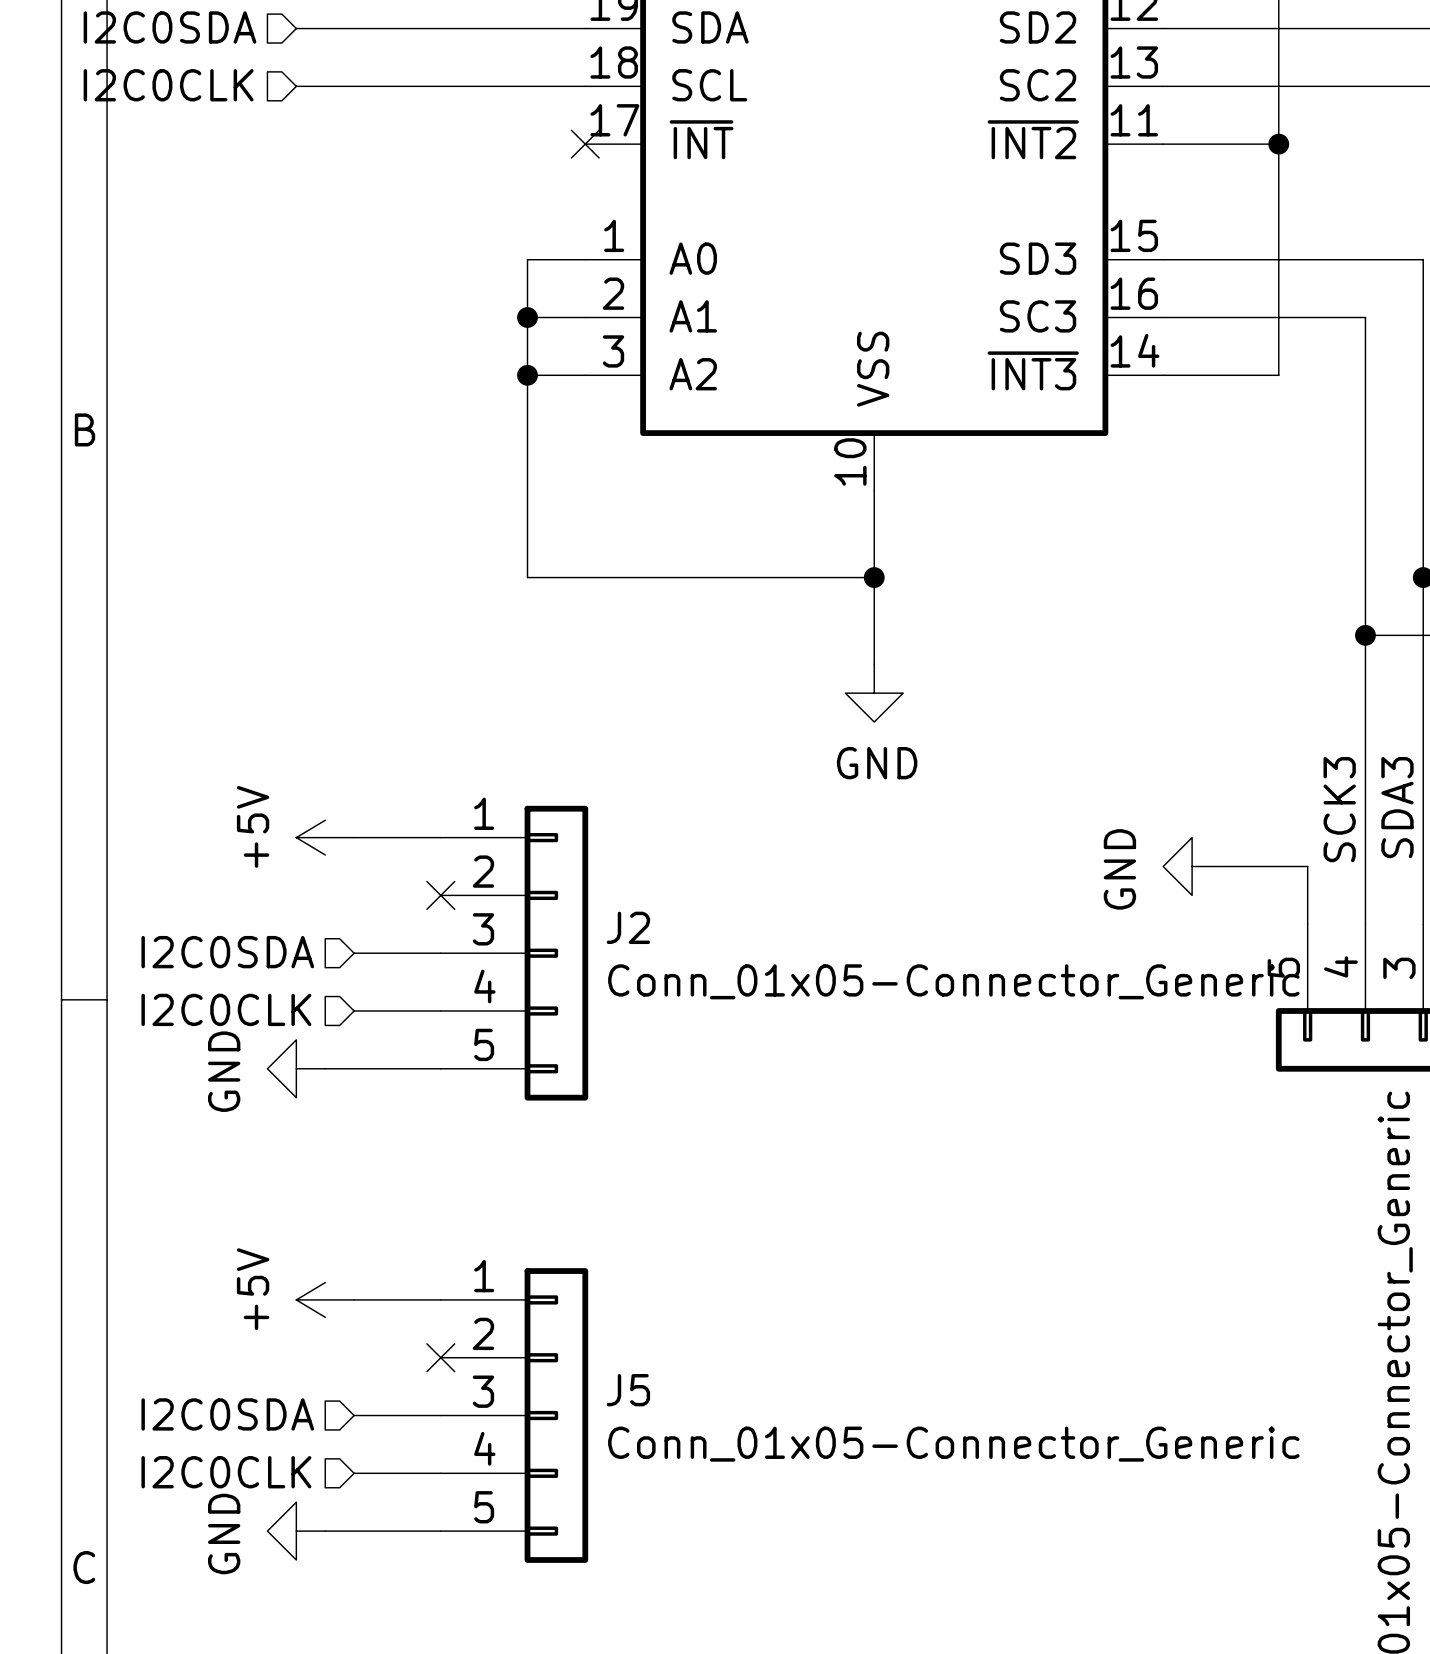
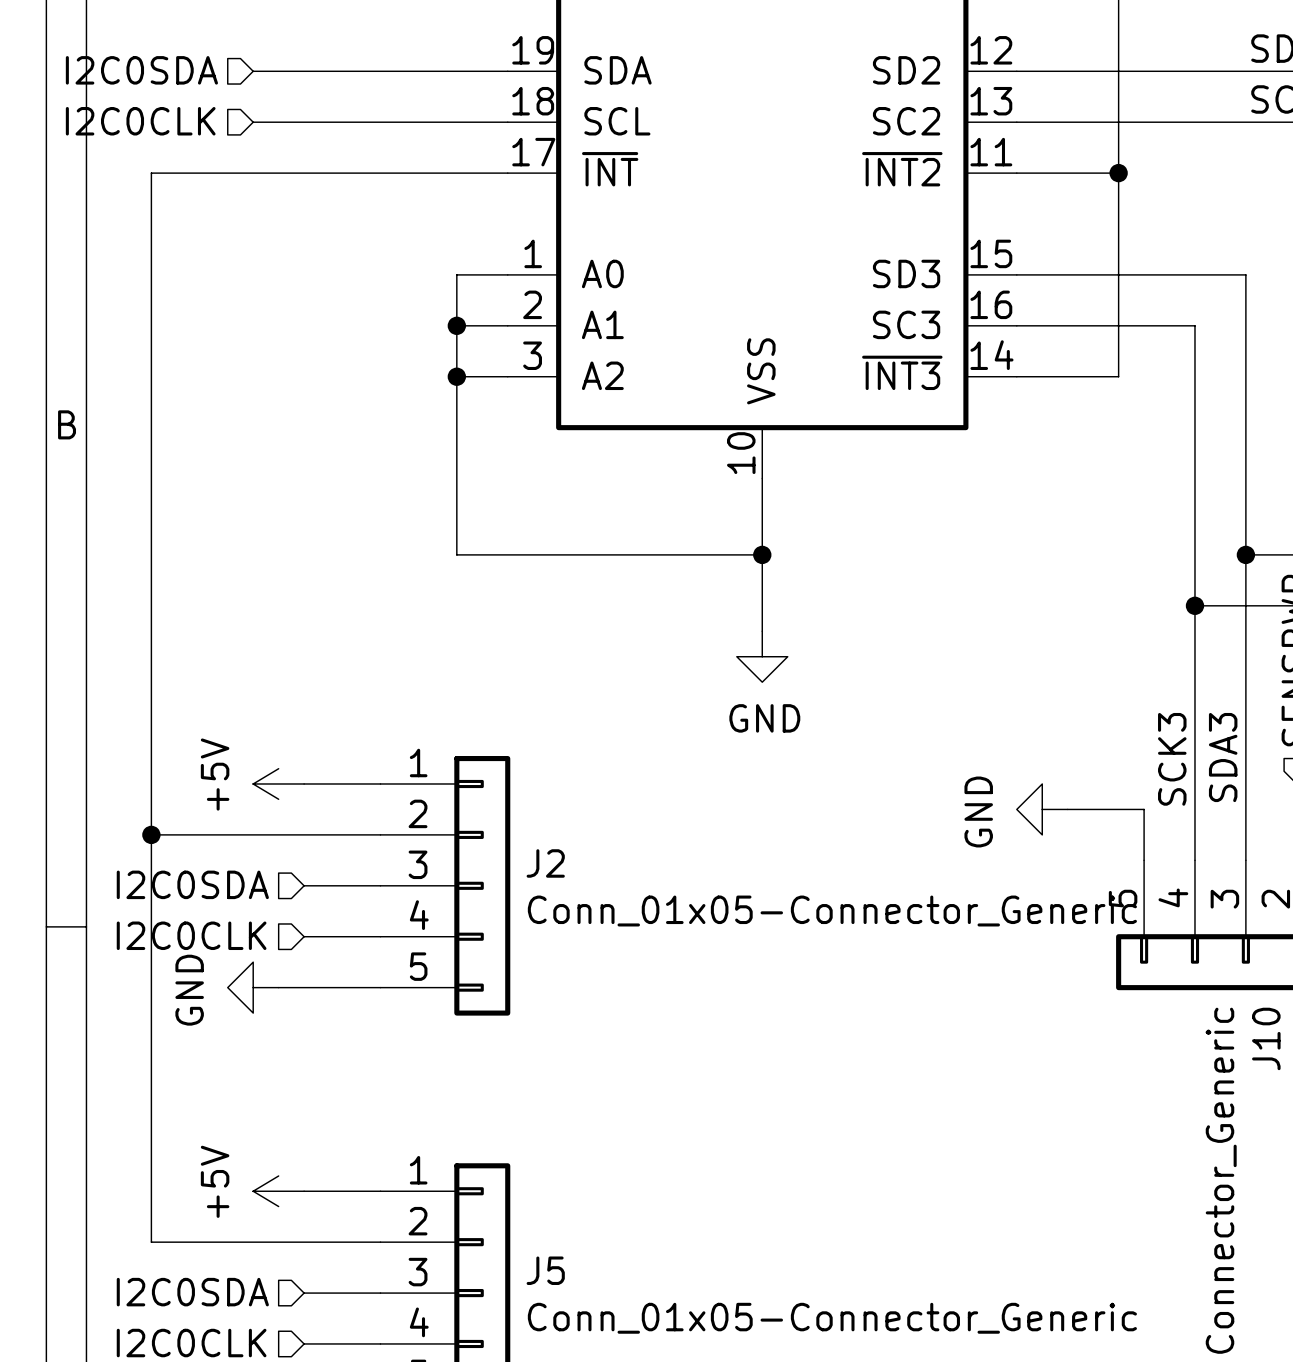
wire: none -> (507, 173) (151, 173) (151, 1242) (380, 1242)
no-connect mark: (585, 144) -> none
wire: none -> (151, 834) (380, 834)
junction: none -> (151, 834)
no-connect mark: (440, 895) -> none
no-connect mark: (440, 1357) -> none

